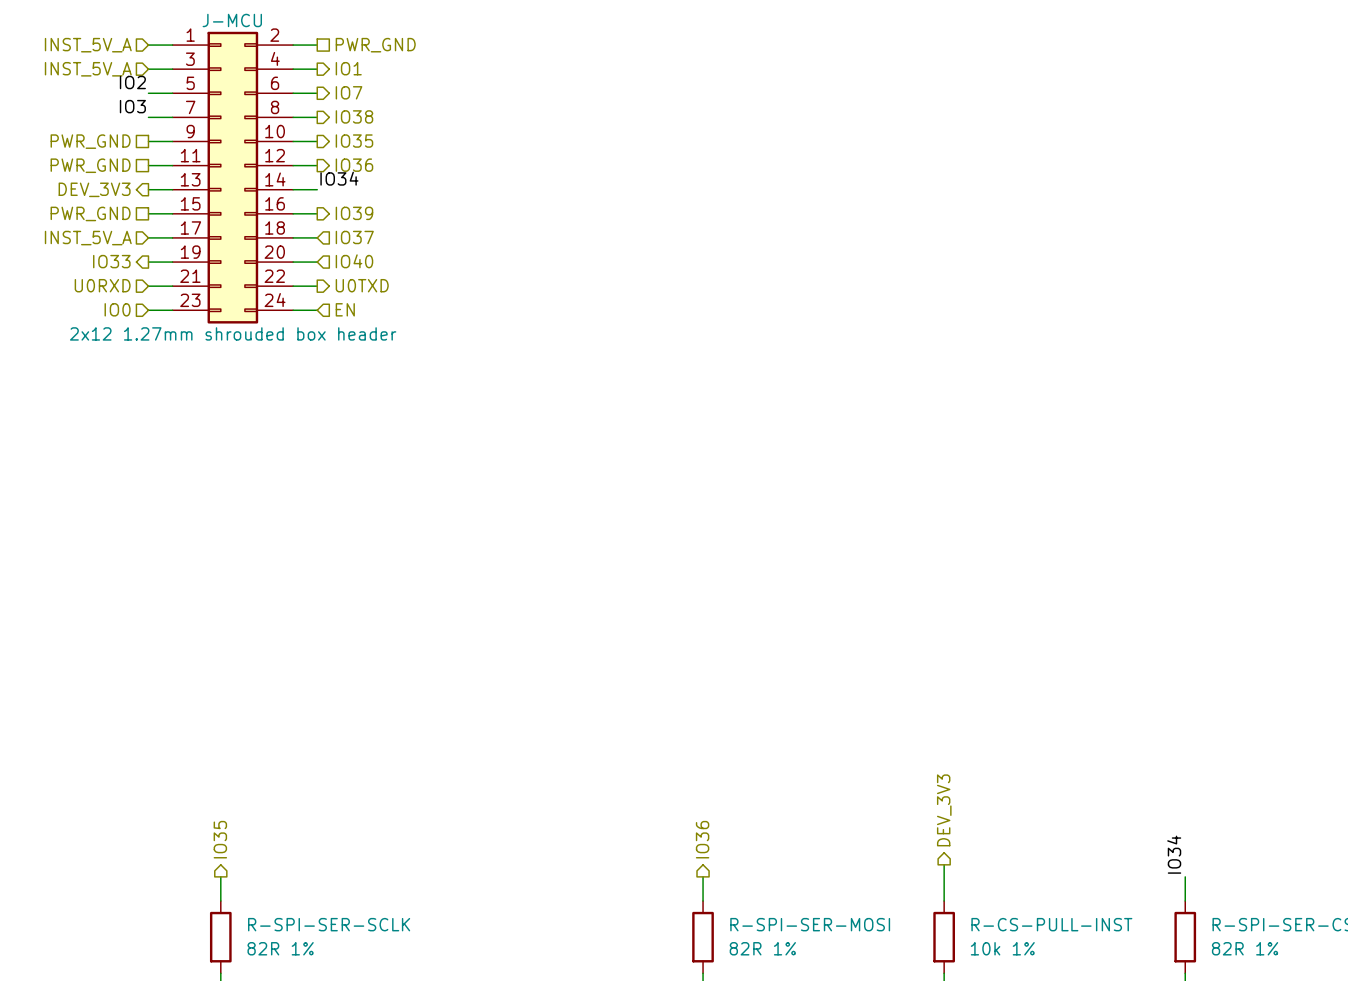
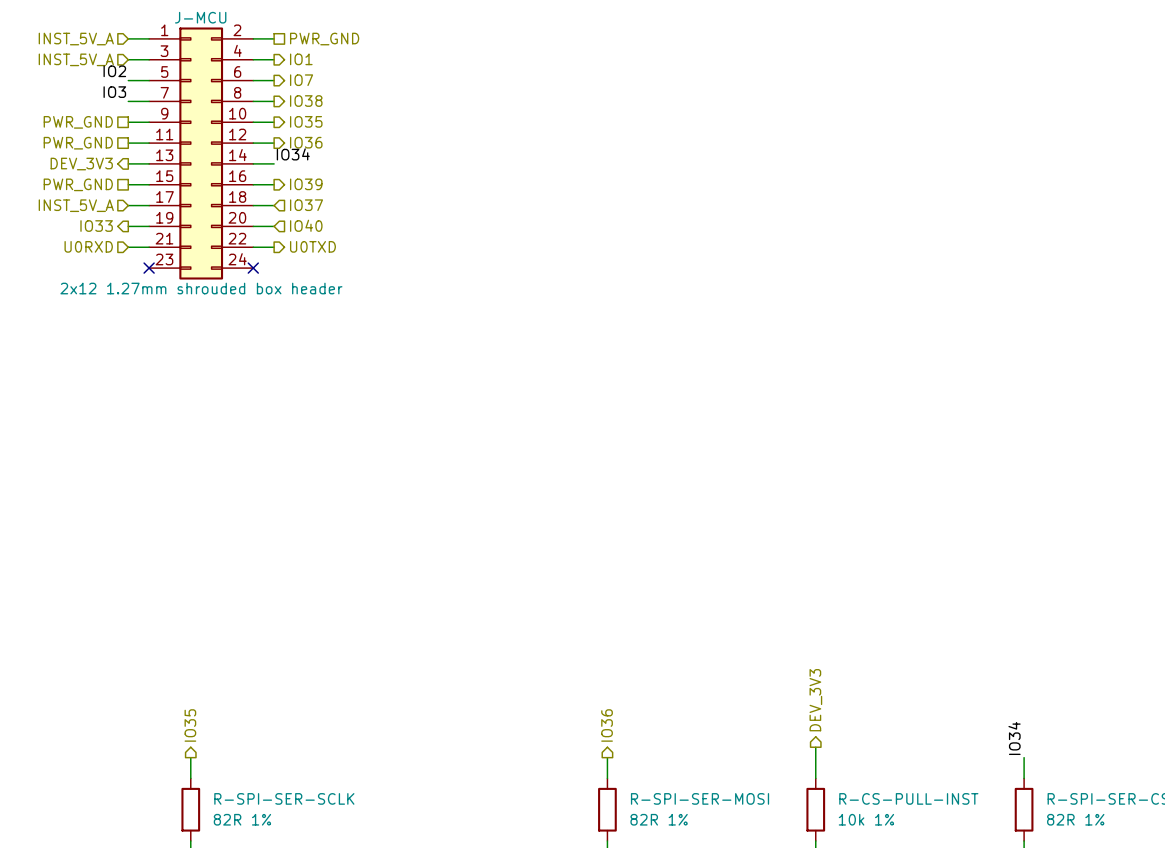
hierarchical label: IO0 (117, 309) -> none
hierarchical label: EN (345, 309) -> none
wire: (148, 310) (172, 310) -> none
no-connect mark: none -> (149, 268)
wire: (293, 310) (317, 310) -> none
no-connect mark: none -> (253, 268)

